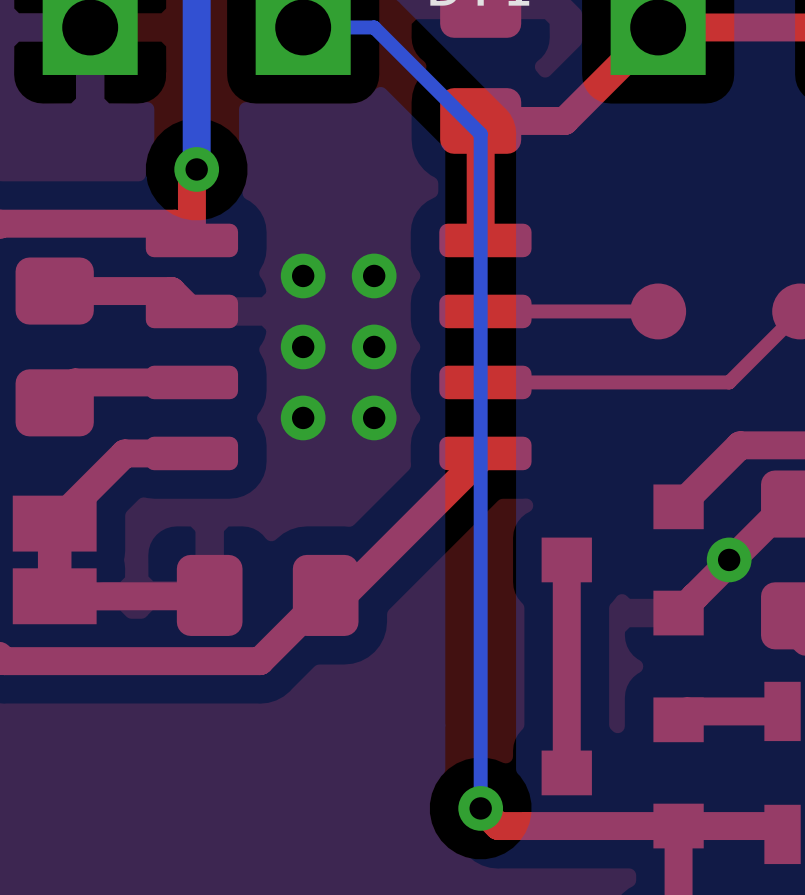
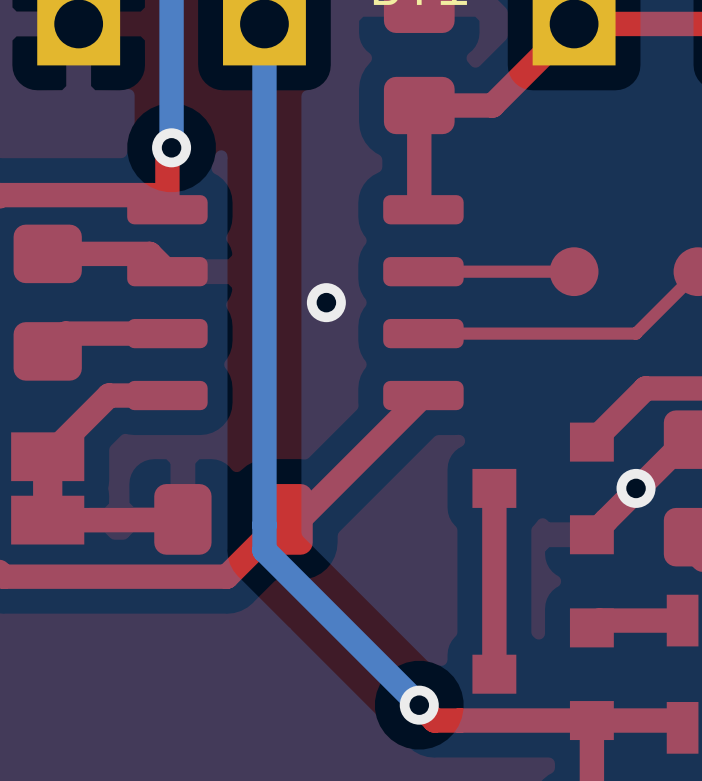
bottom track: (303, 27) (374, 27) (480, 133) (480, 808) -> (264, 23) (264, 550) (419, 705)
via: (303, 275) -> none
via: (374, 275) -> none
via: (303, 346) -> none
via: (303, 417) -> none
via: (374, 417) -> none

